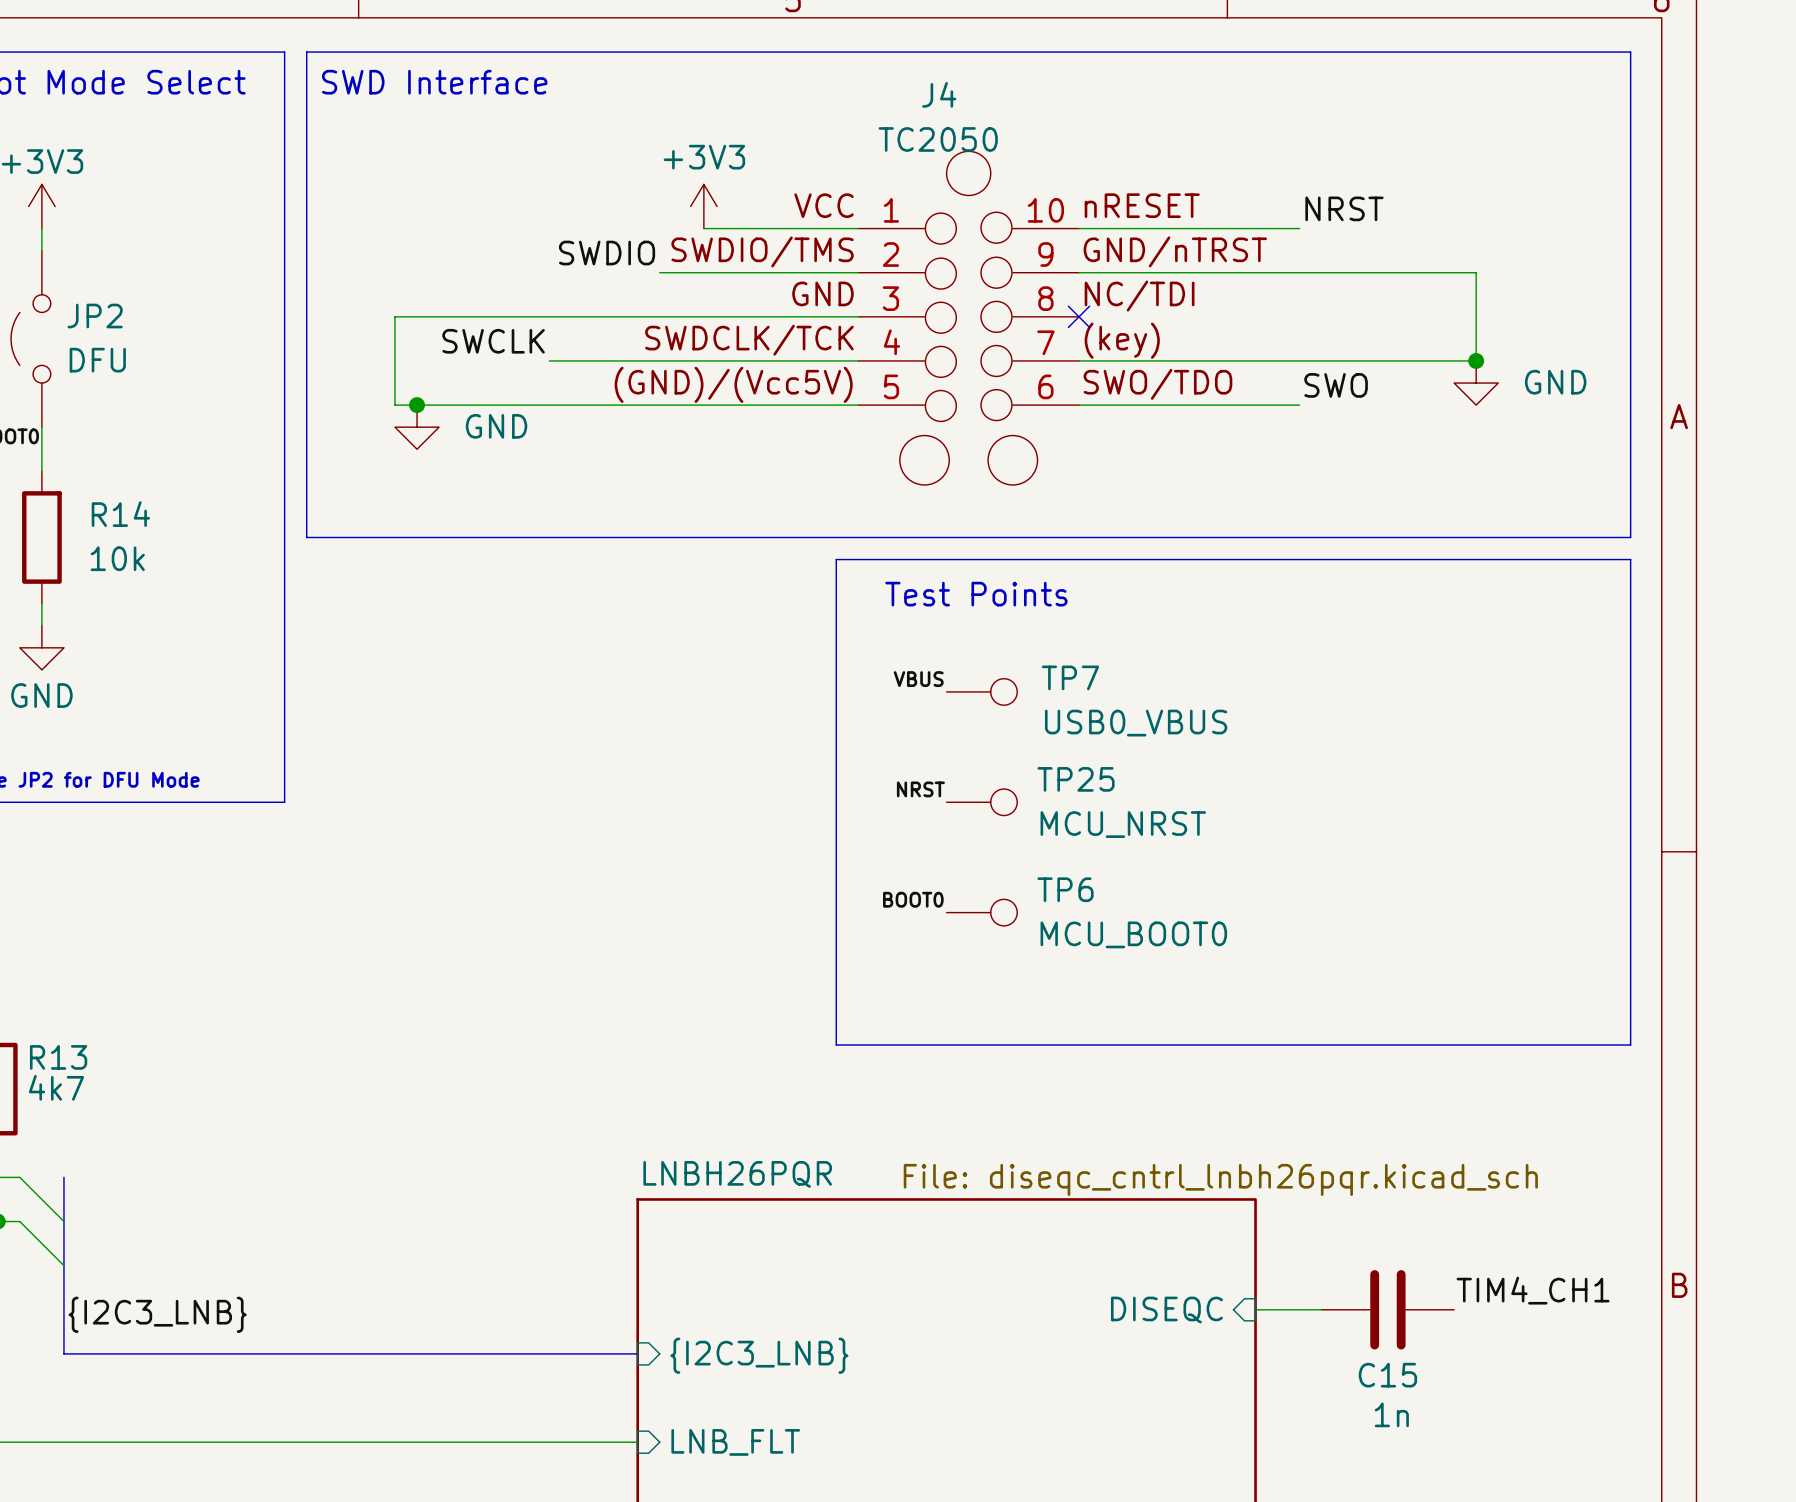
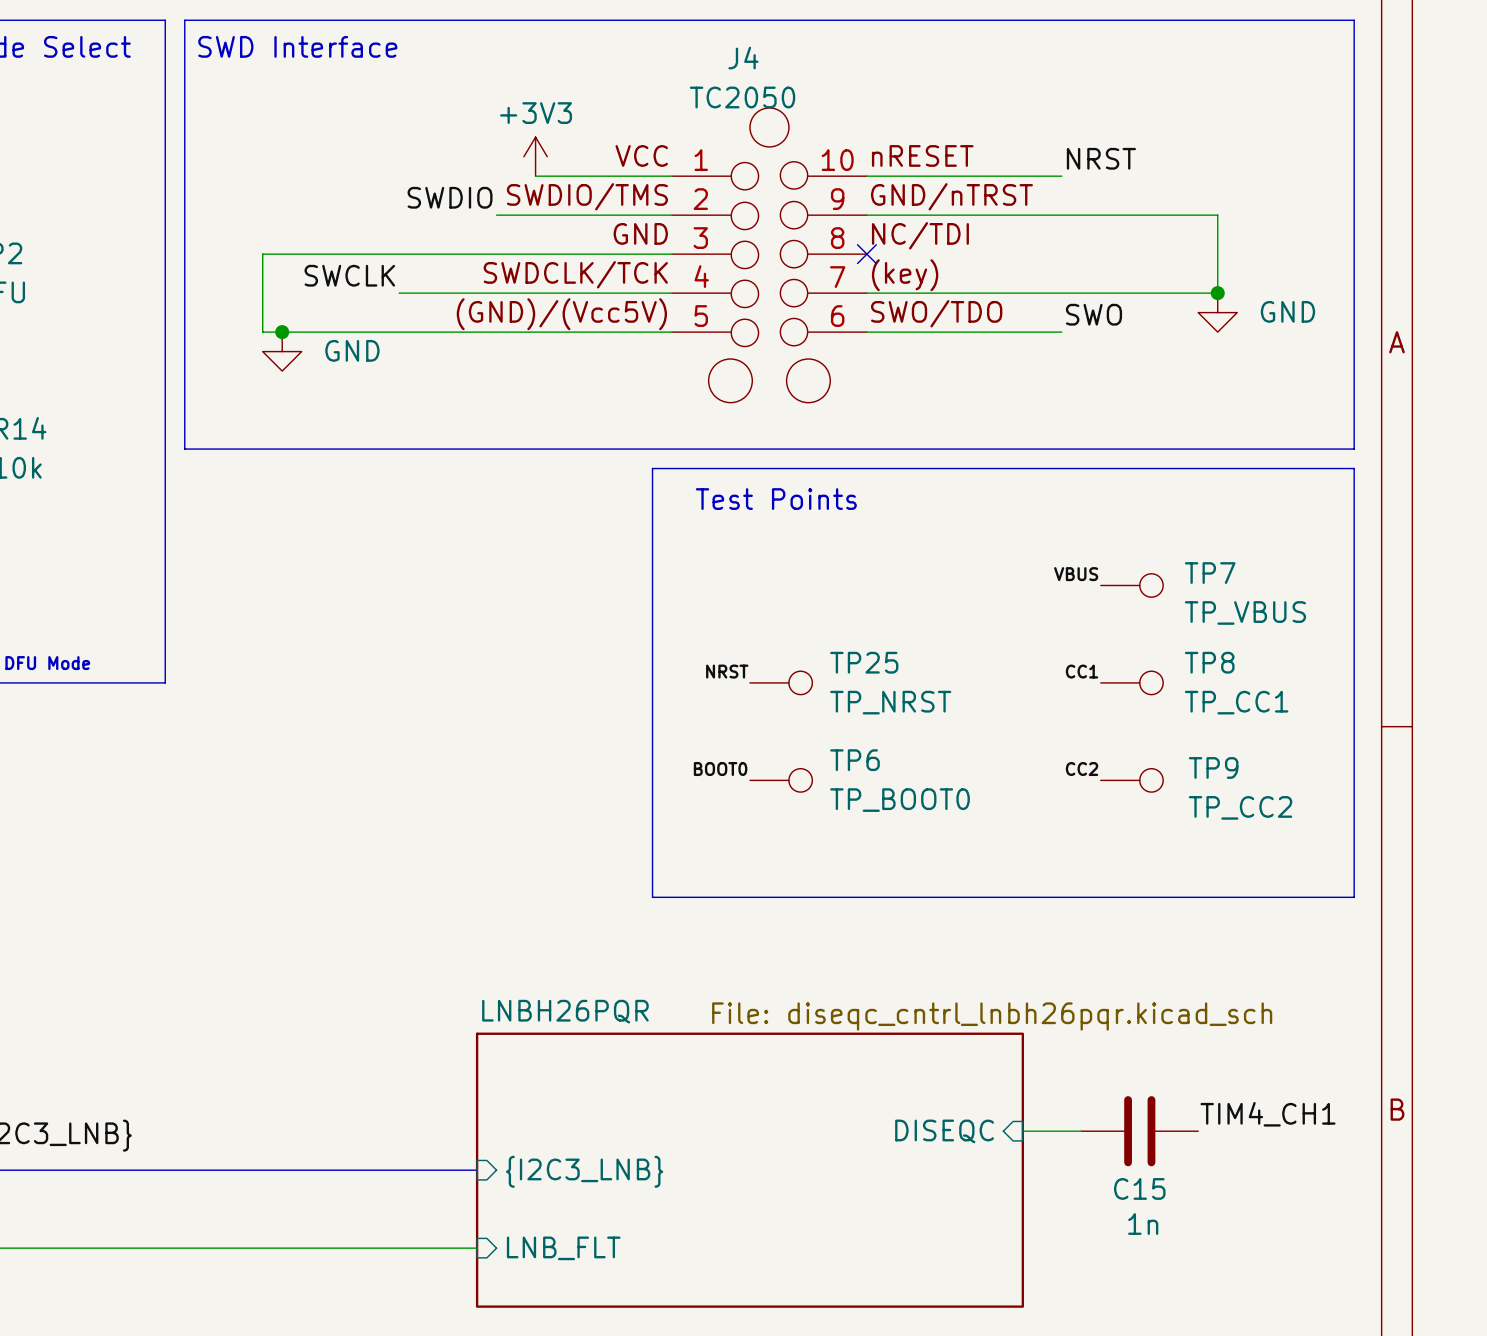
label position: VBUS (918, 679) -> VBUS (1076, 574)
TP7 position: (981, 691) -> (1131, 585)
TP7 value: USB0_VBUS (1136, 723) -> TP_VBUS (1245, 612)
label: none -> CC1 (1081, 671)
TP8: none -> TP_CC1 (1131, 682)
TP25 value: MCU_NRST (1123, 824) -> TP_NRST (890, 702)
label: none -> CC2 (1081, 769)
TP9: none -> TP_CC2 (1131, 780)
TP6 value: MCU_BOOT0 (1133, 934) -> TP_BOOT0 (900, 800)

